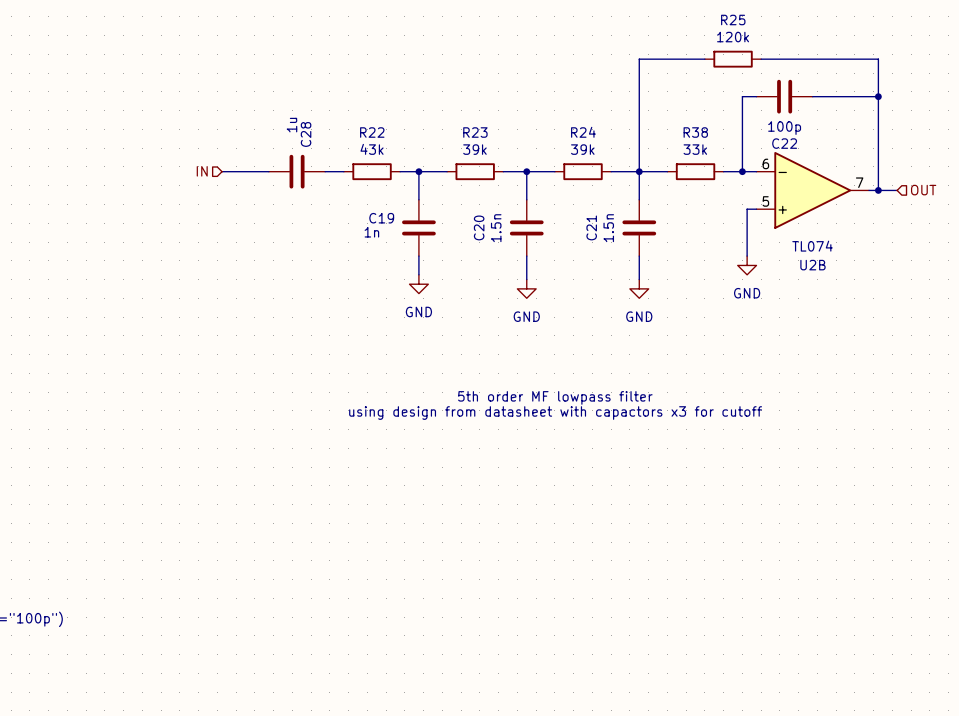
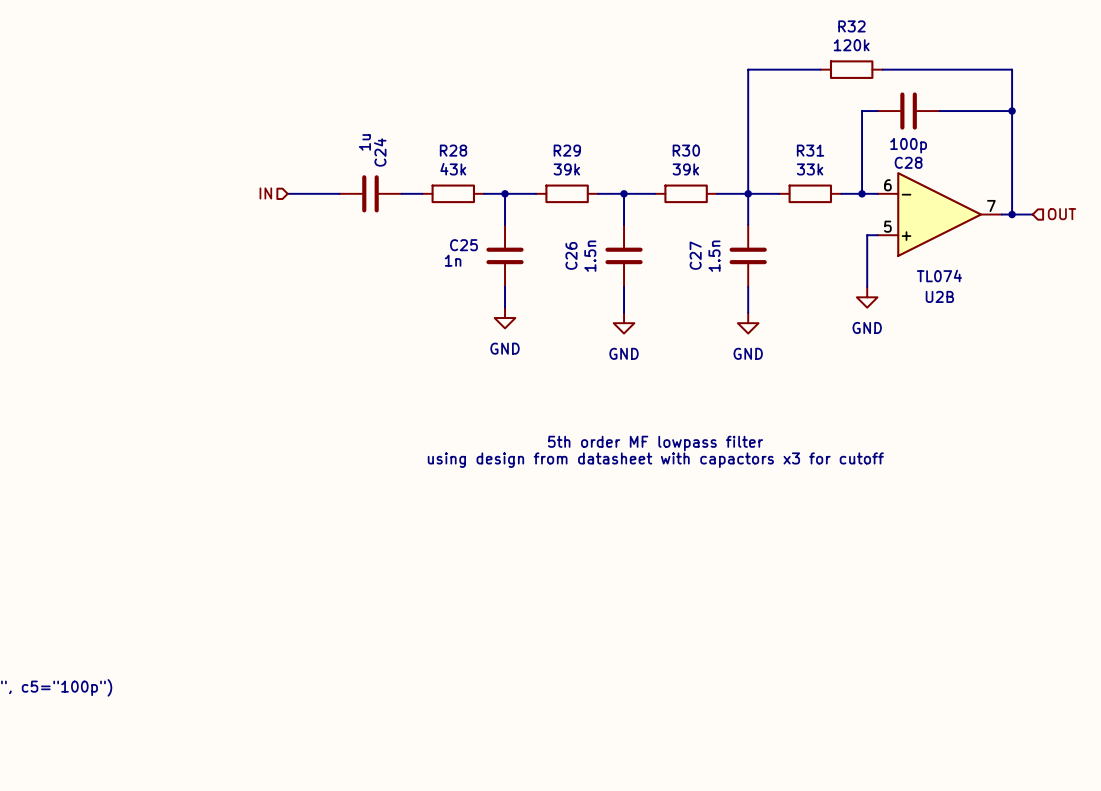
R25 name: R25 (733, 19) -> R32 (851, 26)
R22 name: R22 (372, 132) -> R28 (453, 150)
R23 name: R23 (475, 132) -> R29 (567, 150)
R24 name: R24 (583, 132) -> R30 (686, 150)
R38 name: R38 (695, 132) -> R31 (810, 150)
C28 name: C28 (306, 134) -> C24 (380, 152)
C22 name: C22 (784, 143) -> C28 (908, 162)
C19 name: C19 (381, 218) -> C25 (463, 245)
C20 name: C20 (479, 227) -> C26 (571, 255)
C21 name: C21 (591, 227) -> C27 (695, 255)

